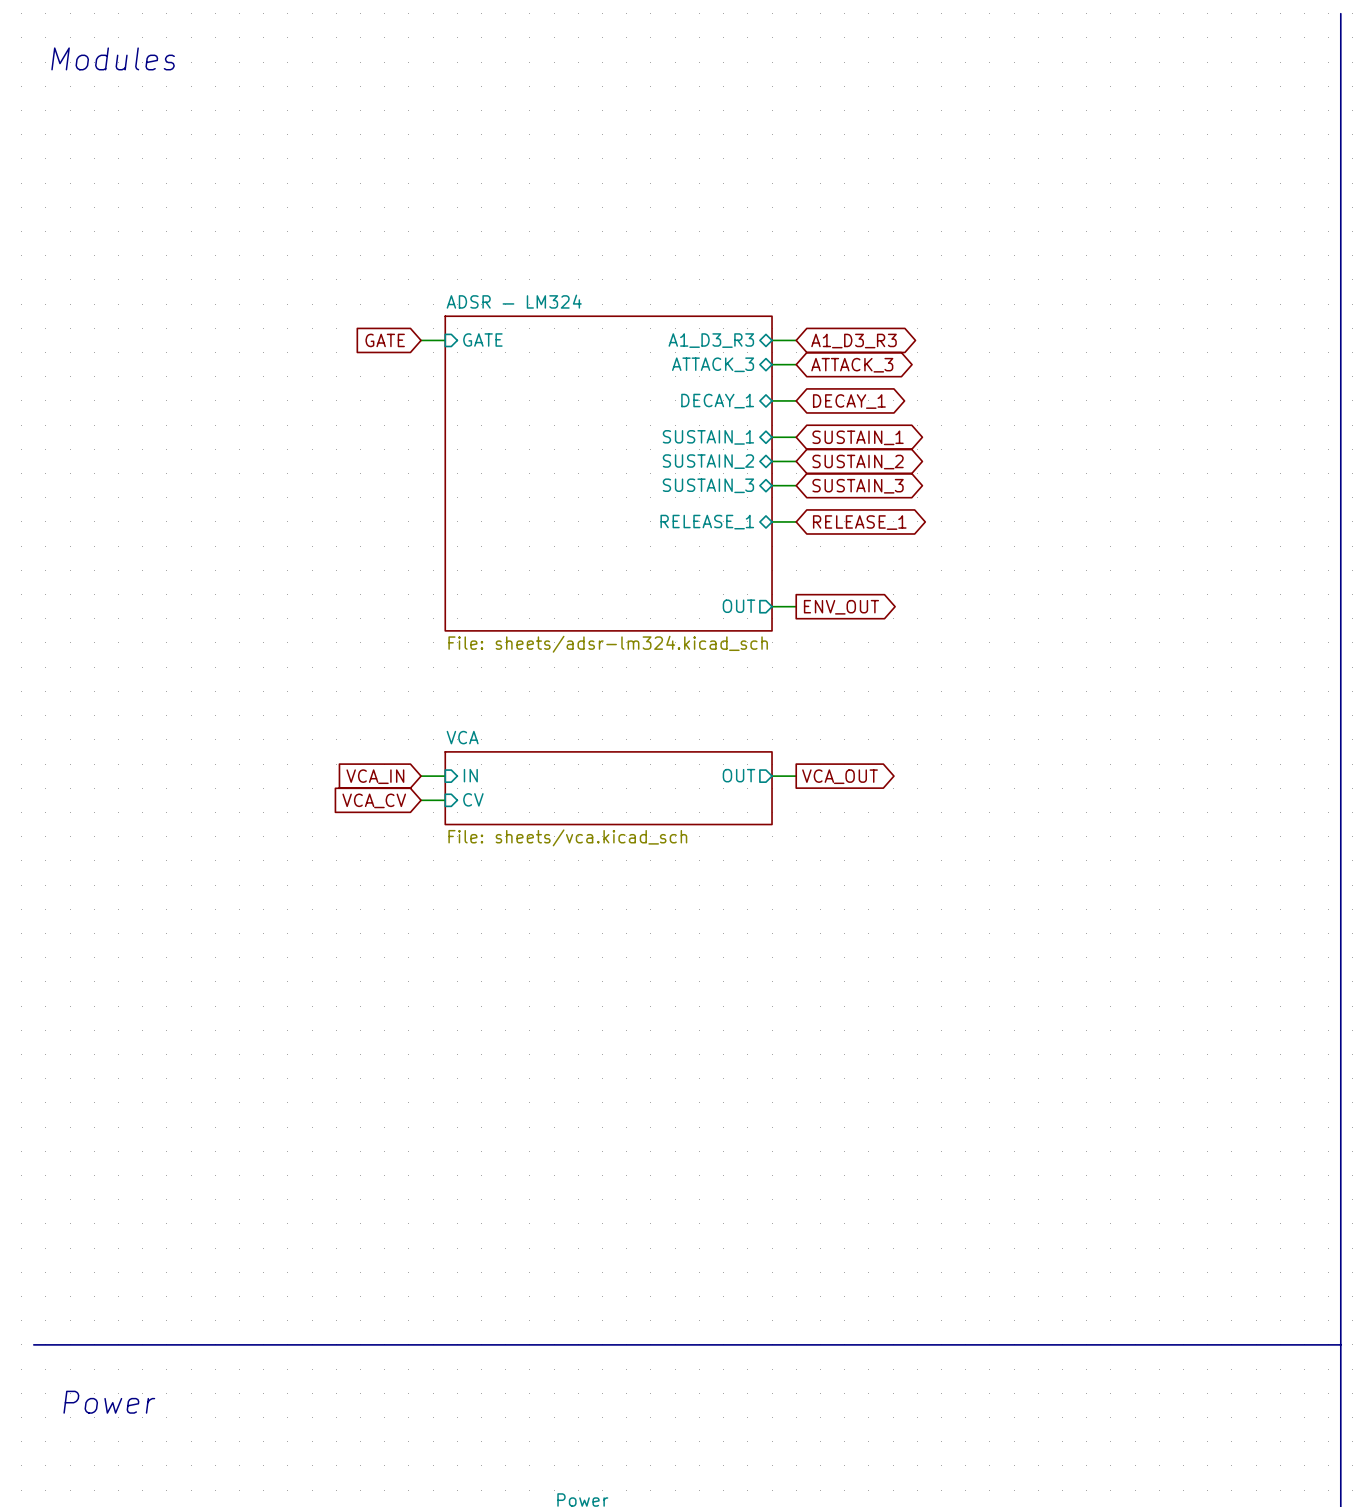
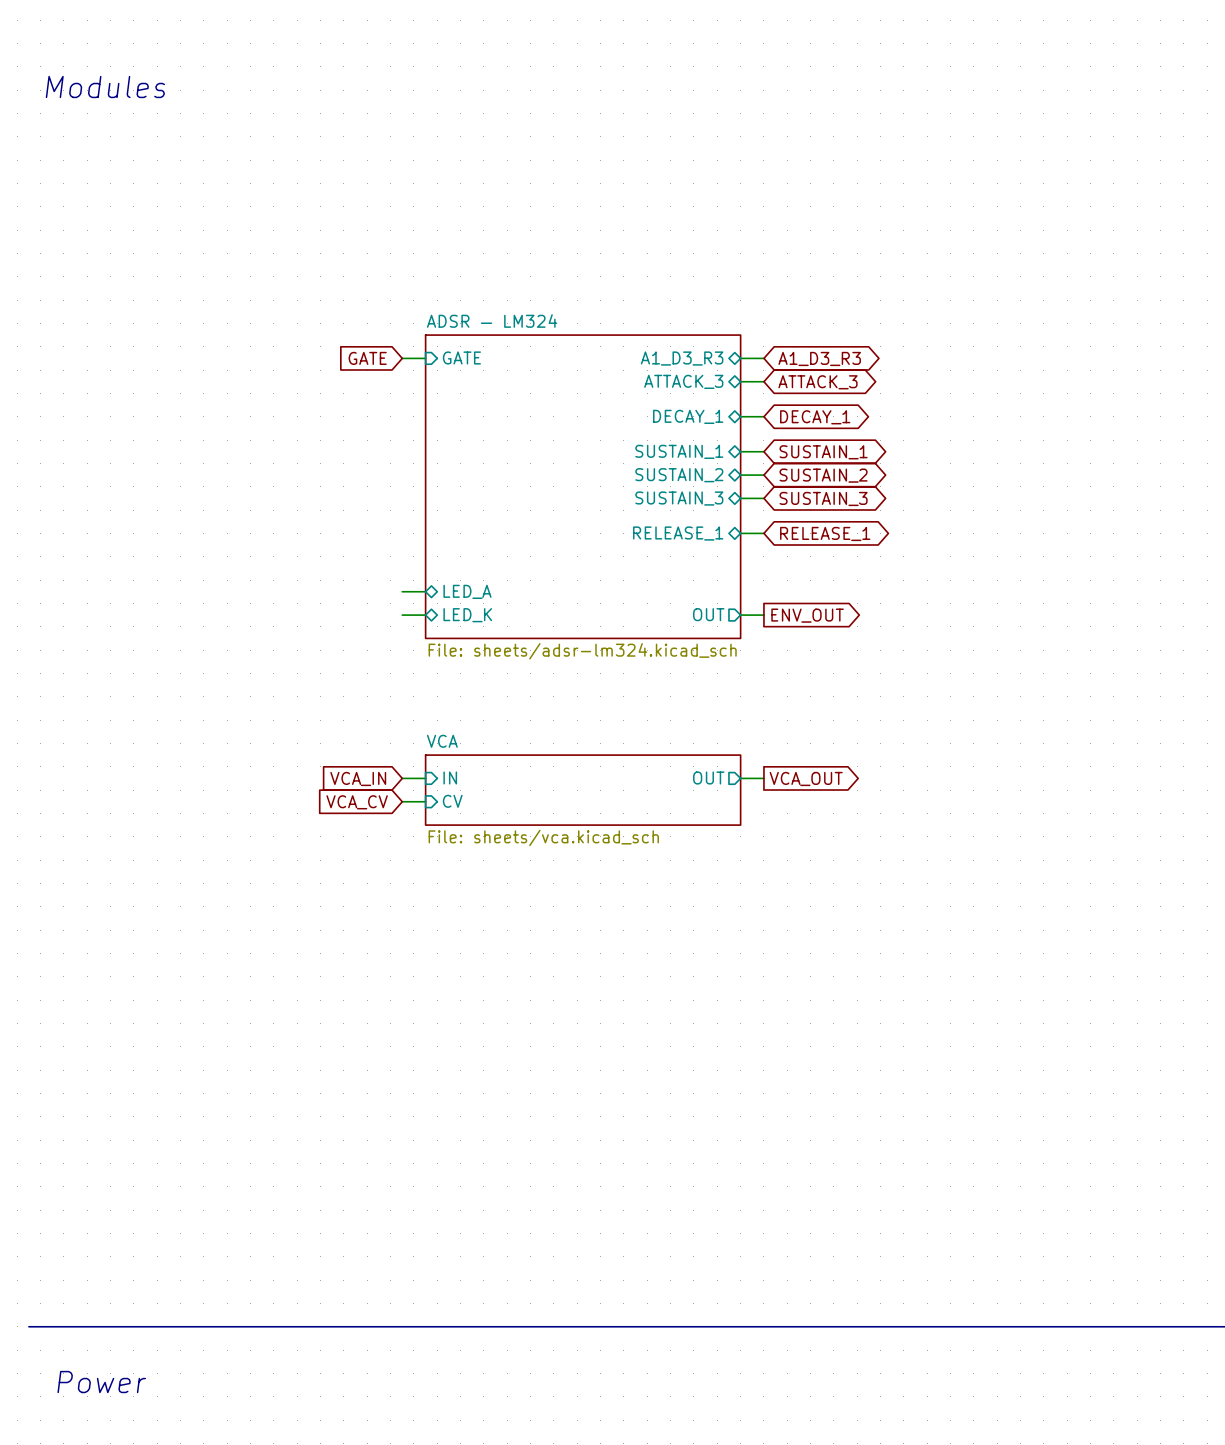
wire: none -> (402, 591) (425, 591)
sheet pin: none -> LED_A (467, 591)
wire: none -> (402, 615) (425, 615)
sheet pin: none -> LED_K (467, 615)

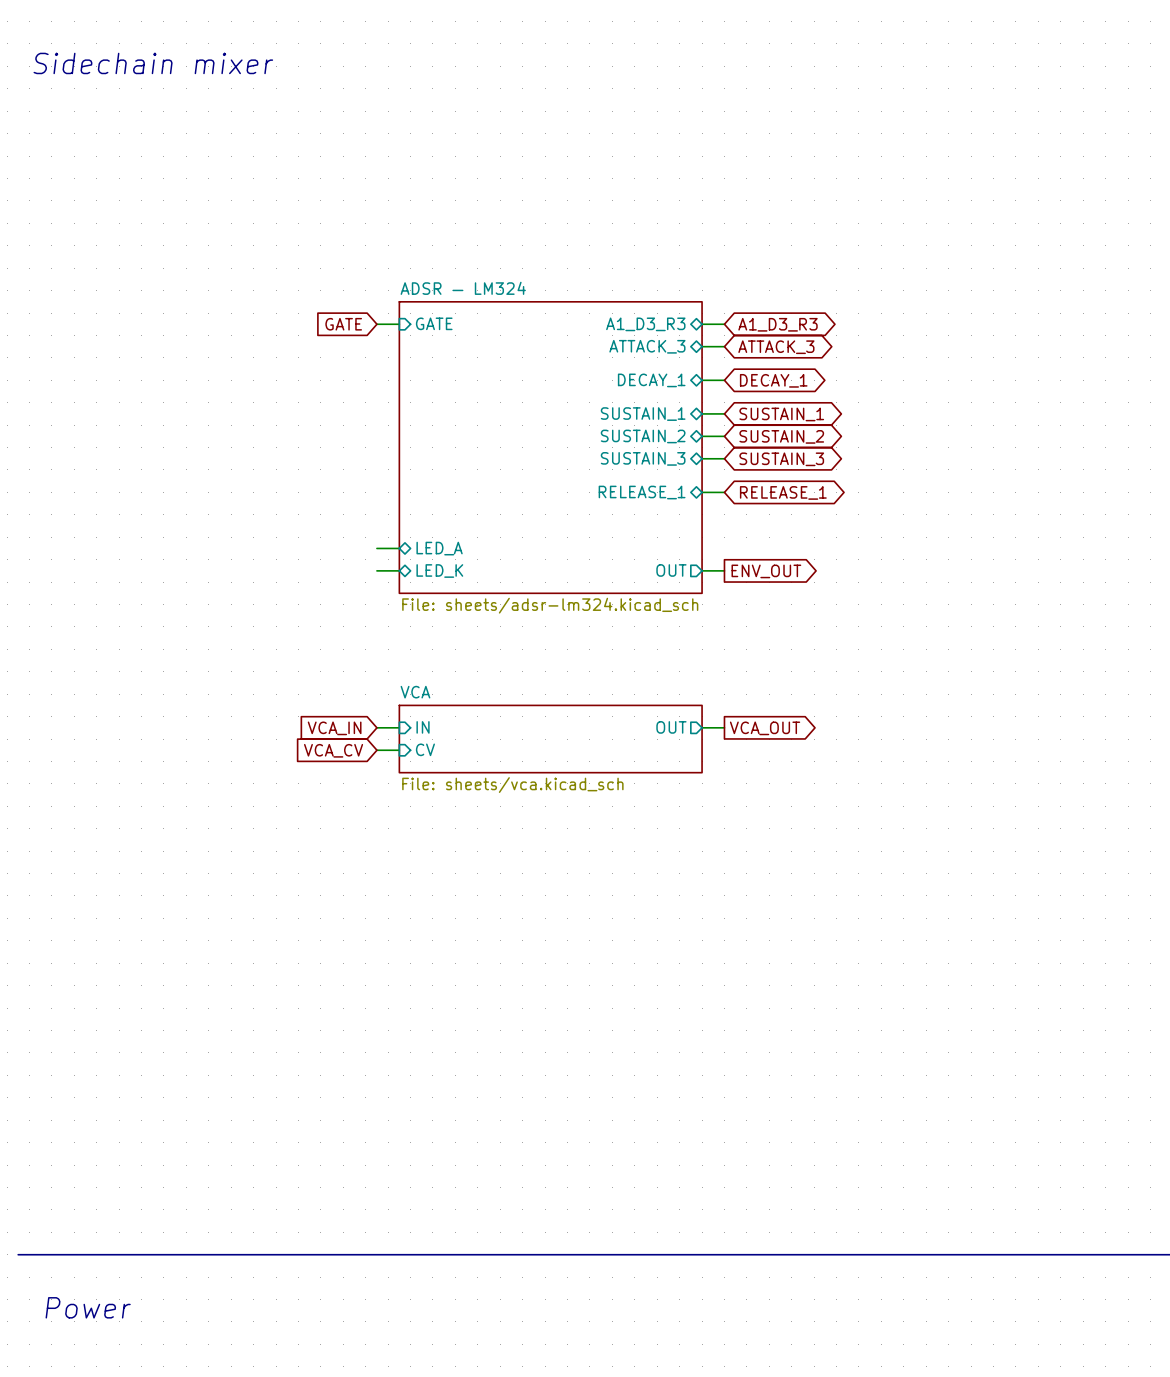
text: Modules (105, 86) -> Sidechain mixer (153, 63)

